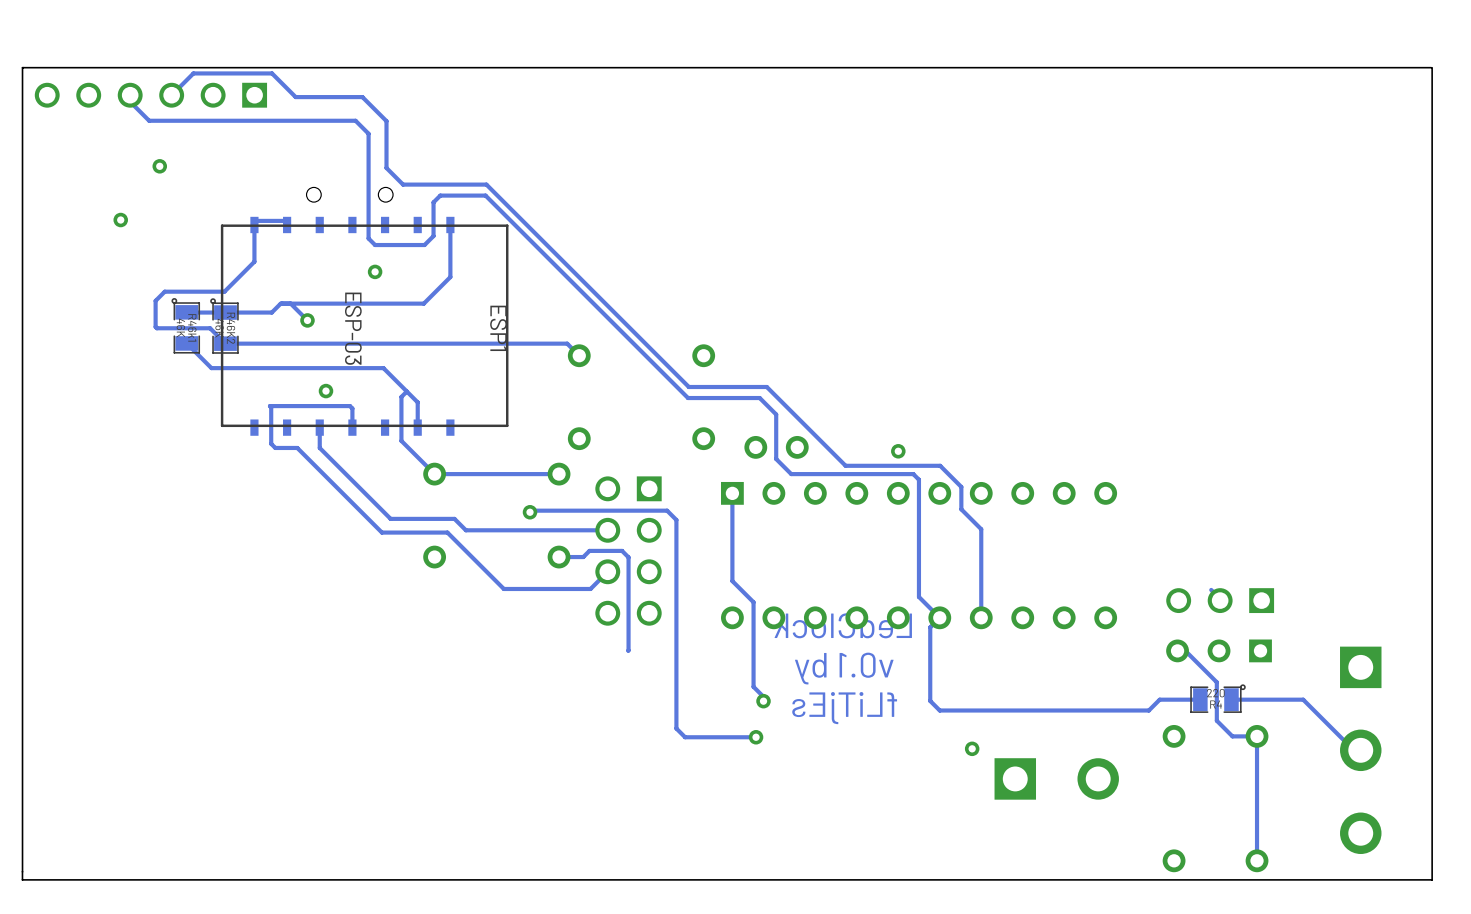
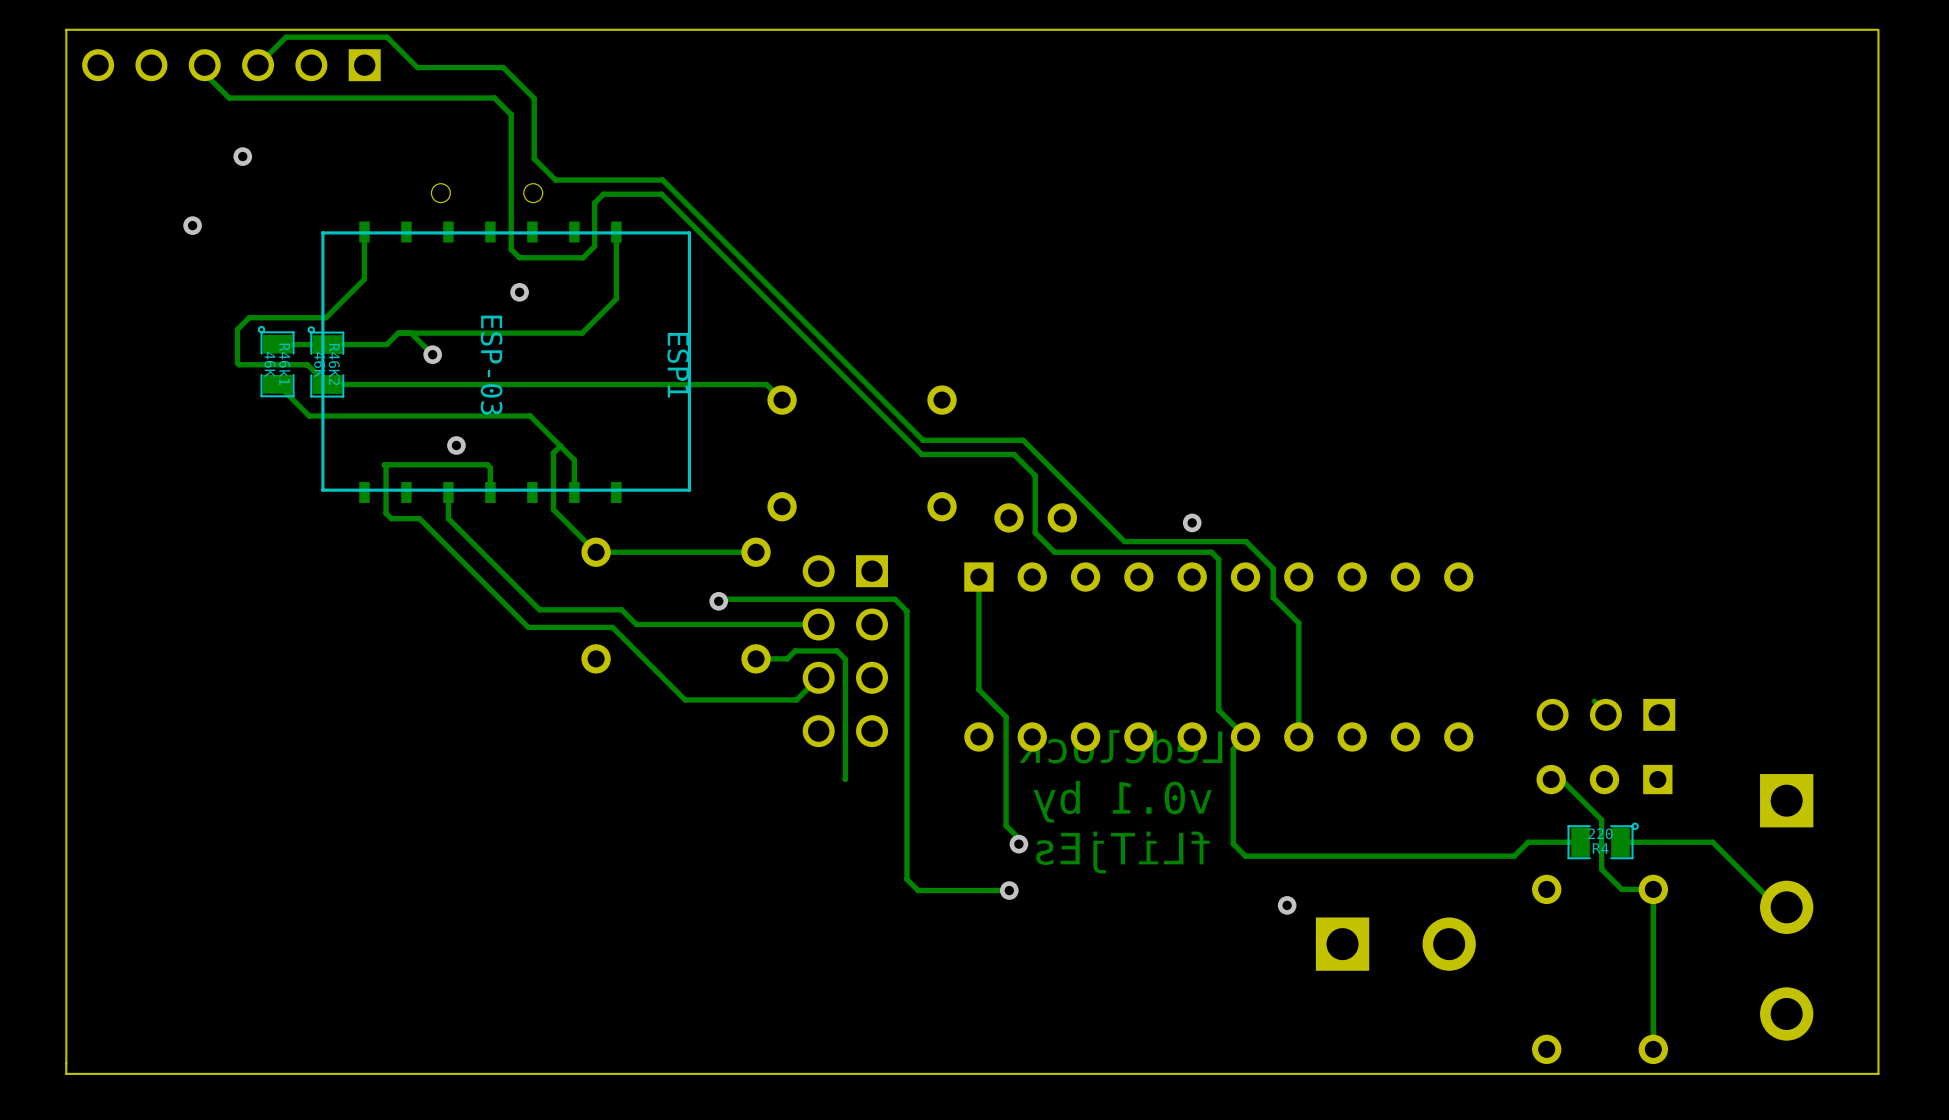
track: (287, 220) (254, 220) -> none

